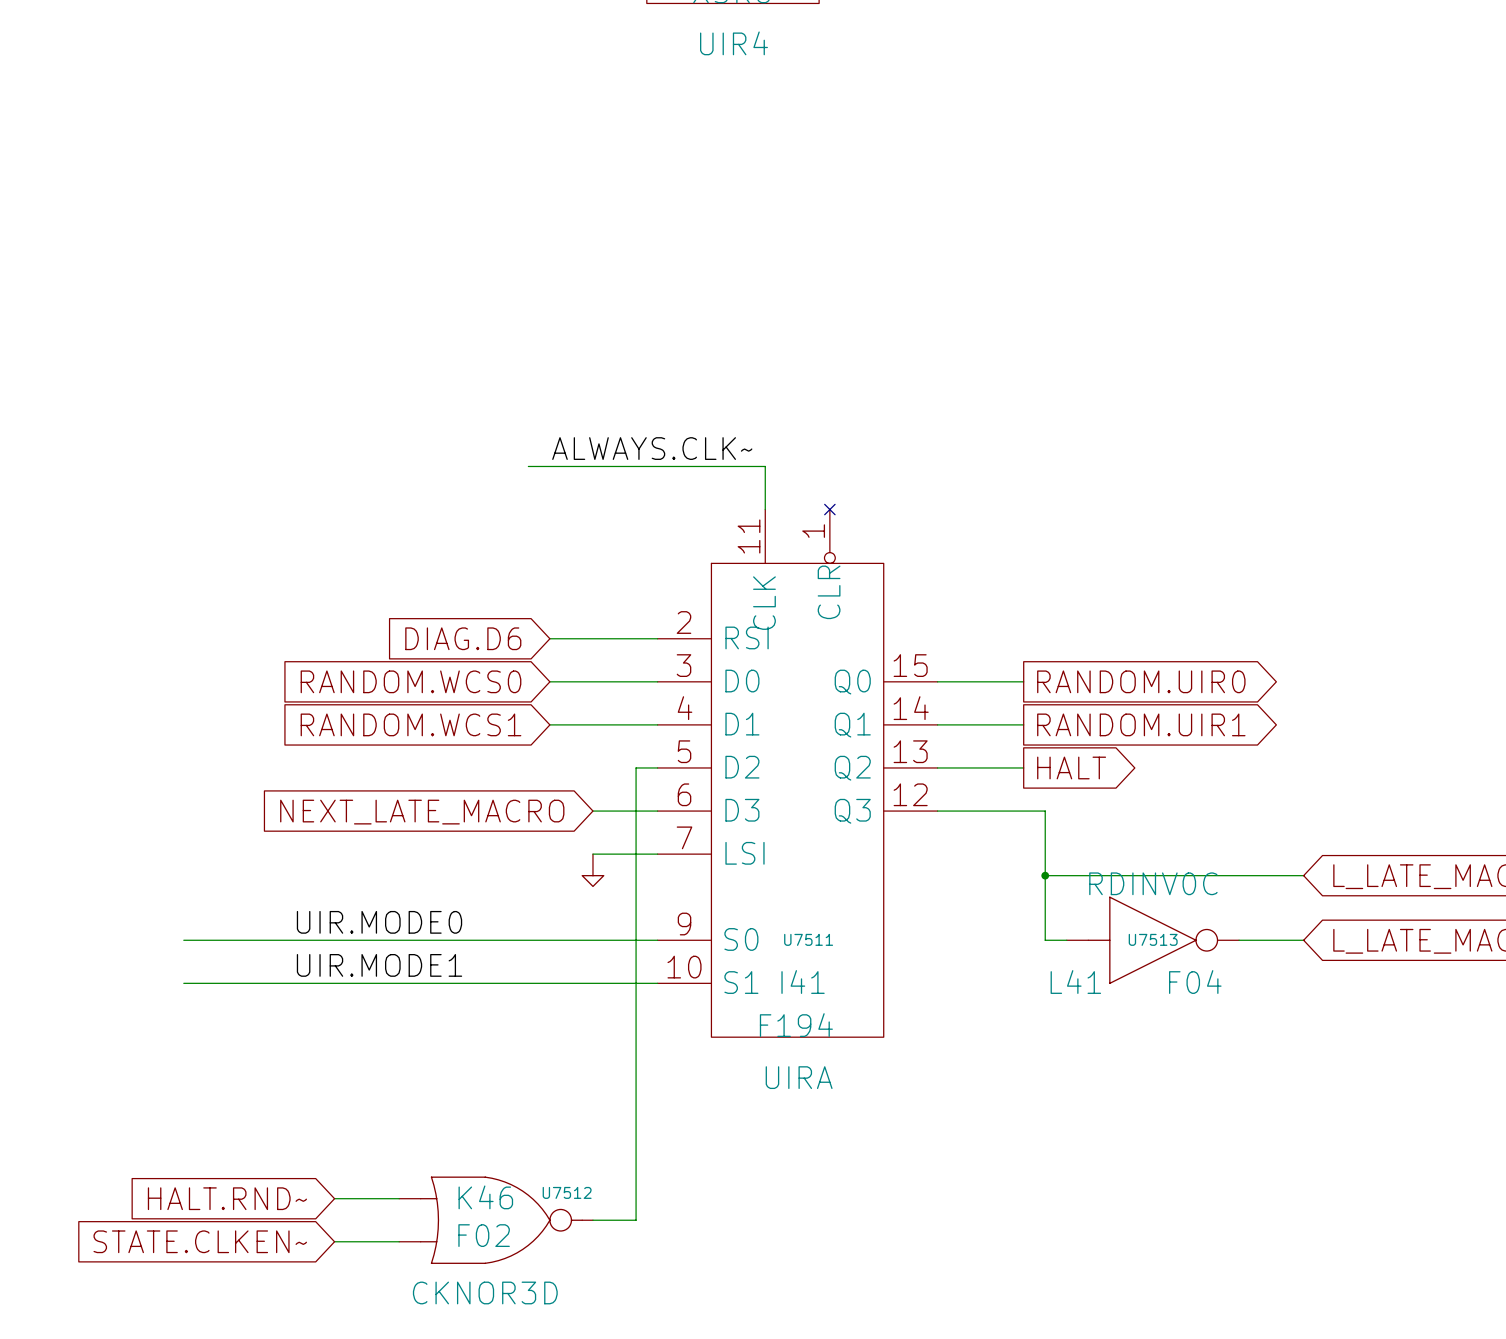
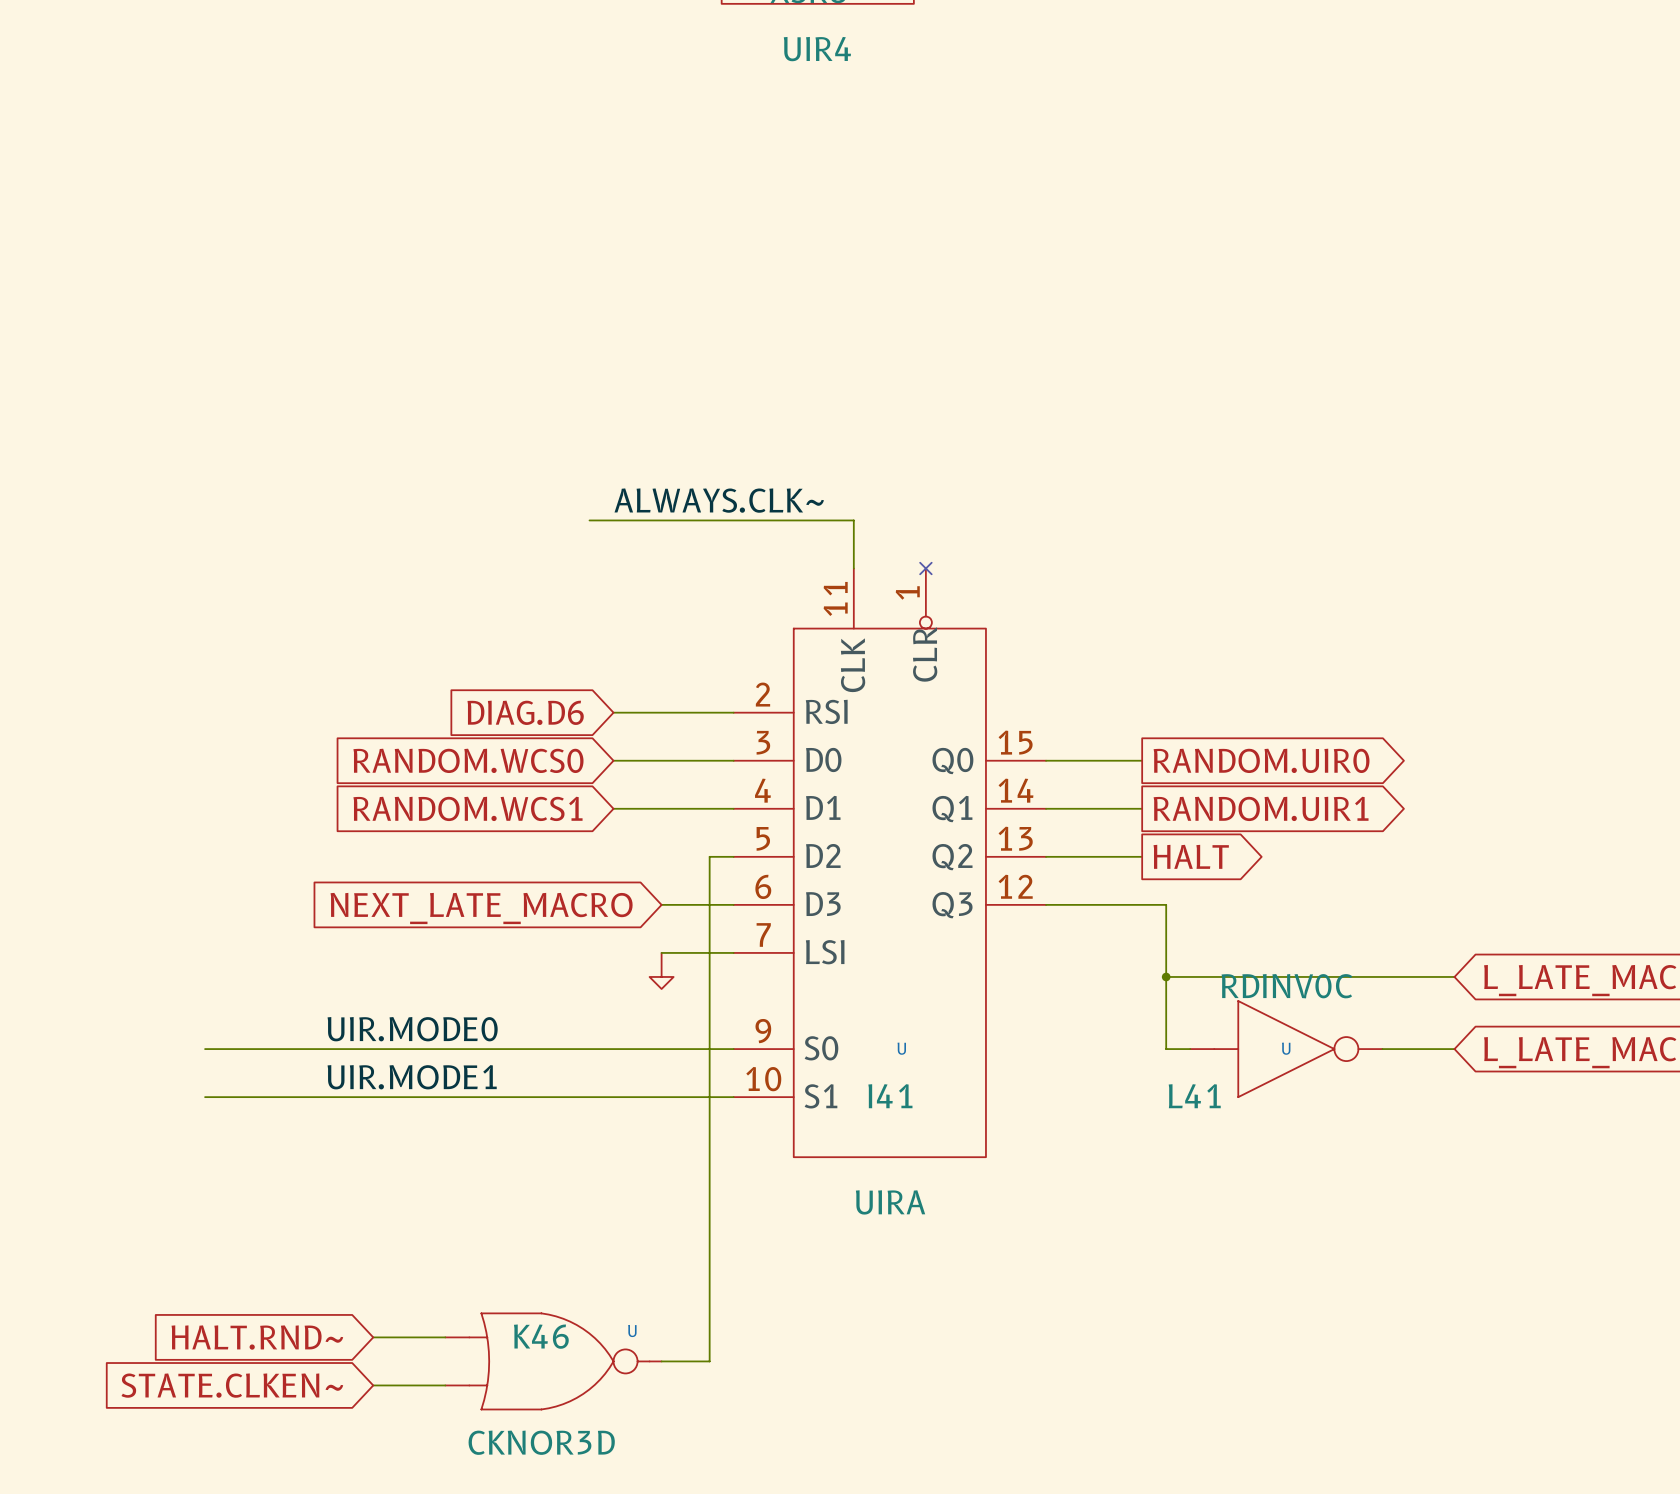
U7511 name: U7511 (808, 939) -> U (901, 1048)
U7513 name: U7513 (1153, 939) -> U (1286, 1048)
U7513 value: F04 (1195, 982) -> none
U7511 value: F194 (796, 1025) -> none
U7512 name: U7512 (567, 1192) -> U (632, 1331)
U7512 value: F02 (484, 1235) -> none

